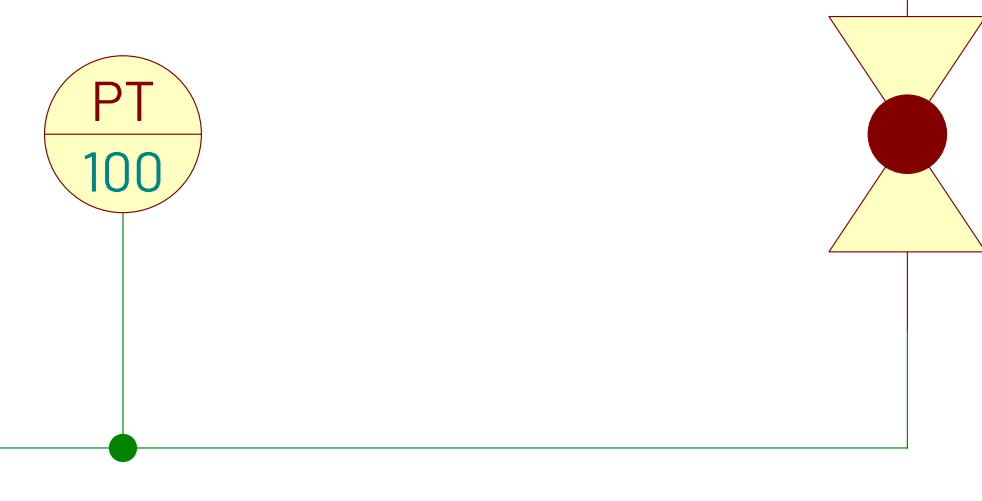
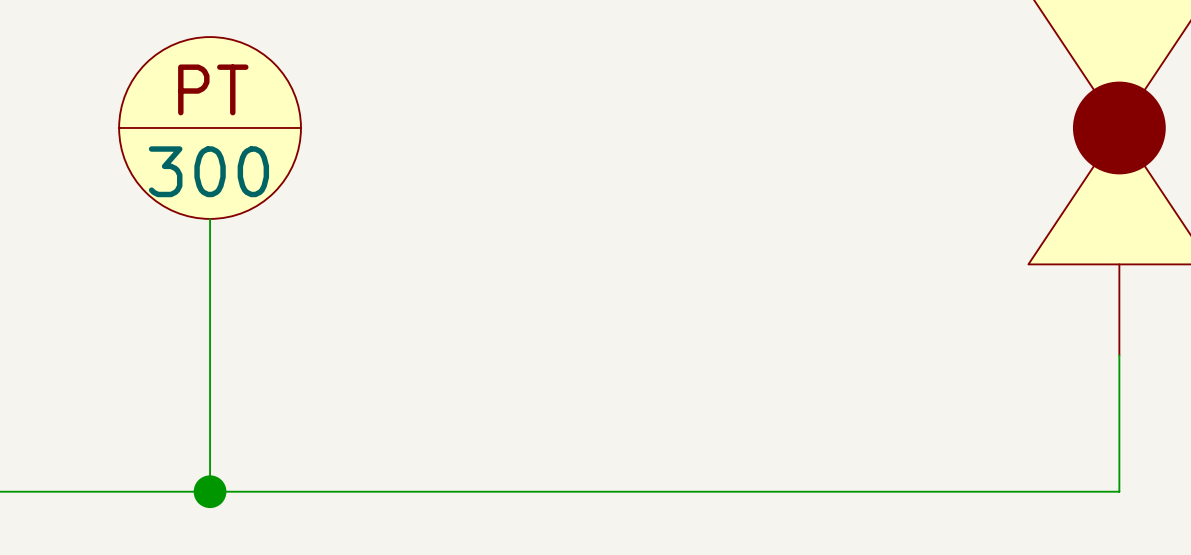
part value: 100 (122, 171) -> 300 (208, 171)

